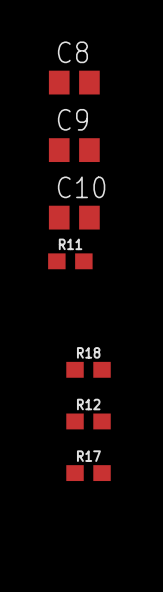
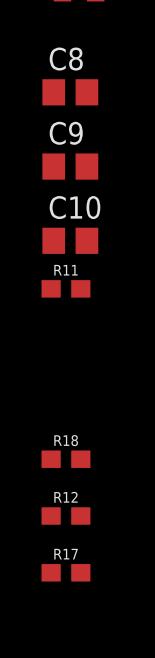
R18 position: (88, 369) -> (65, 459)
R12 position: (88, 421) -> (65, 516)
R17 position: (88, 473) -> (65, 572)

